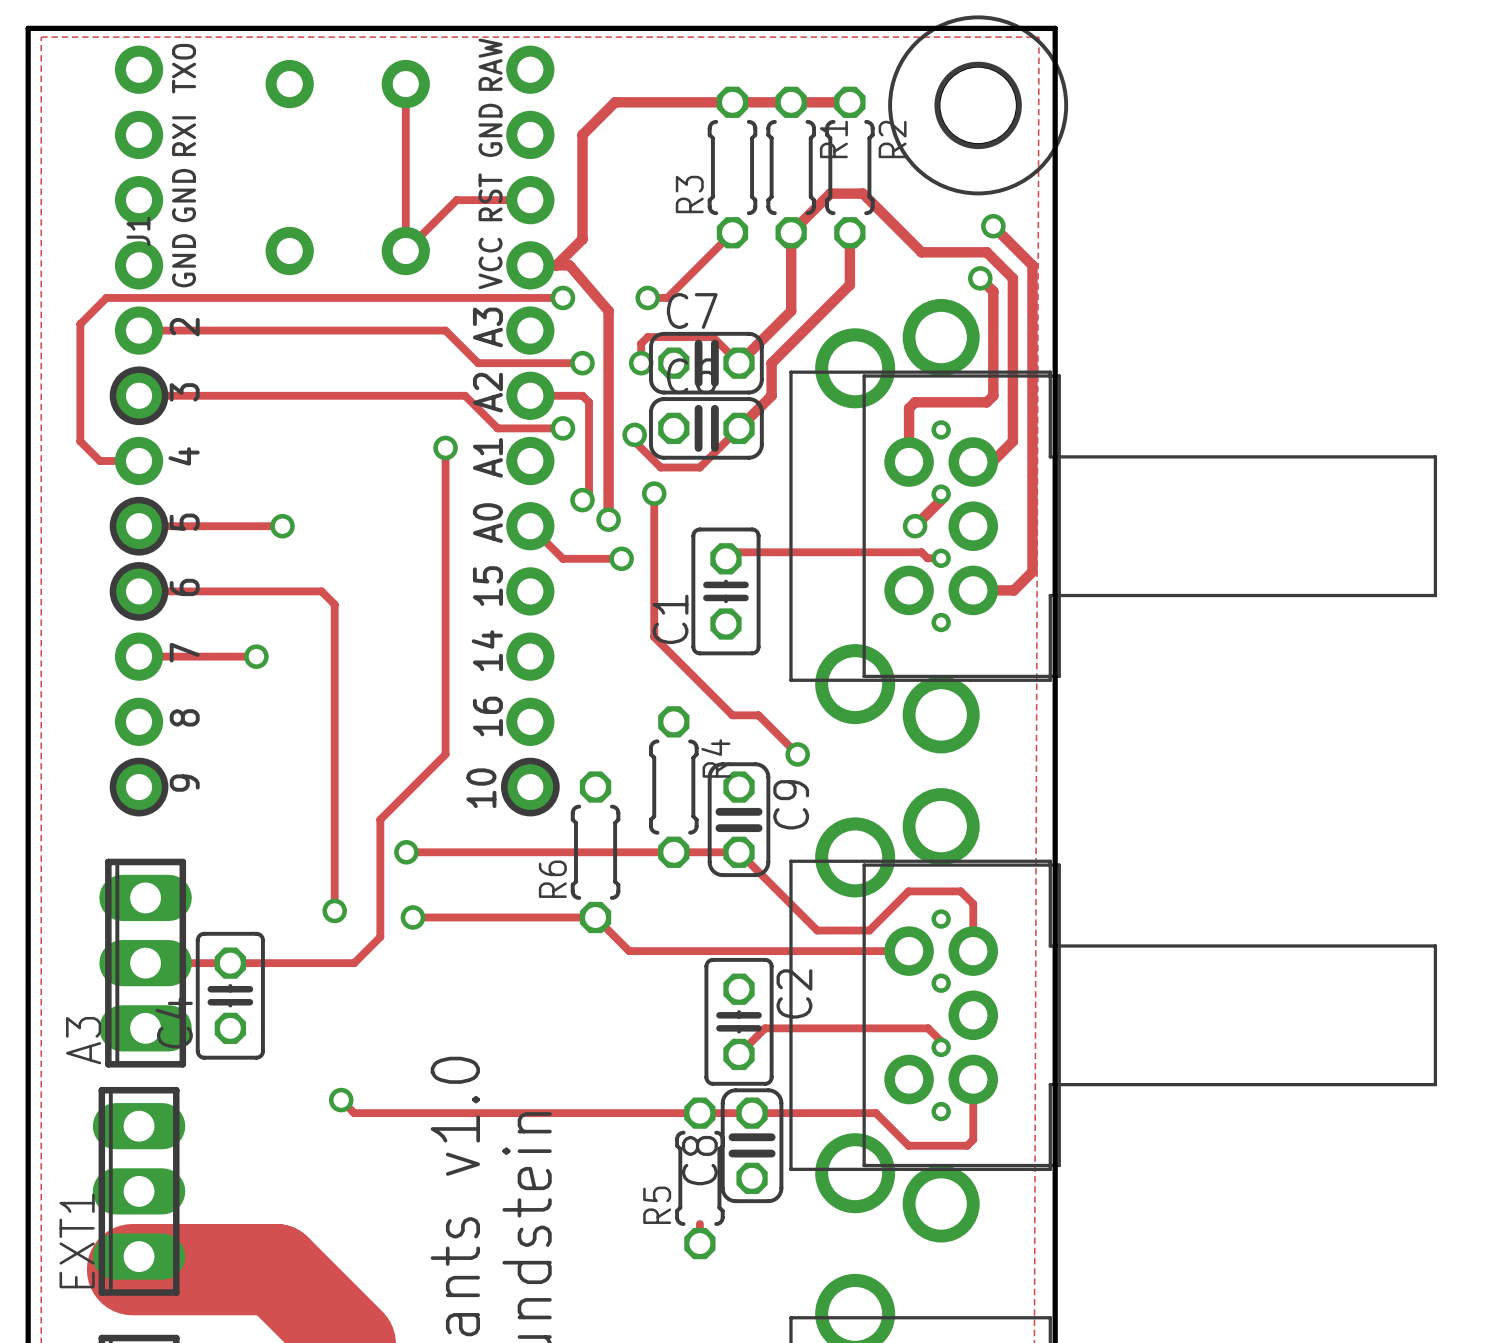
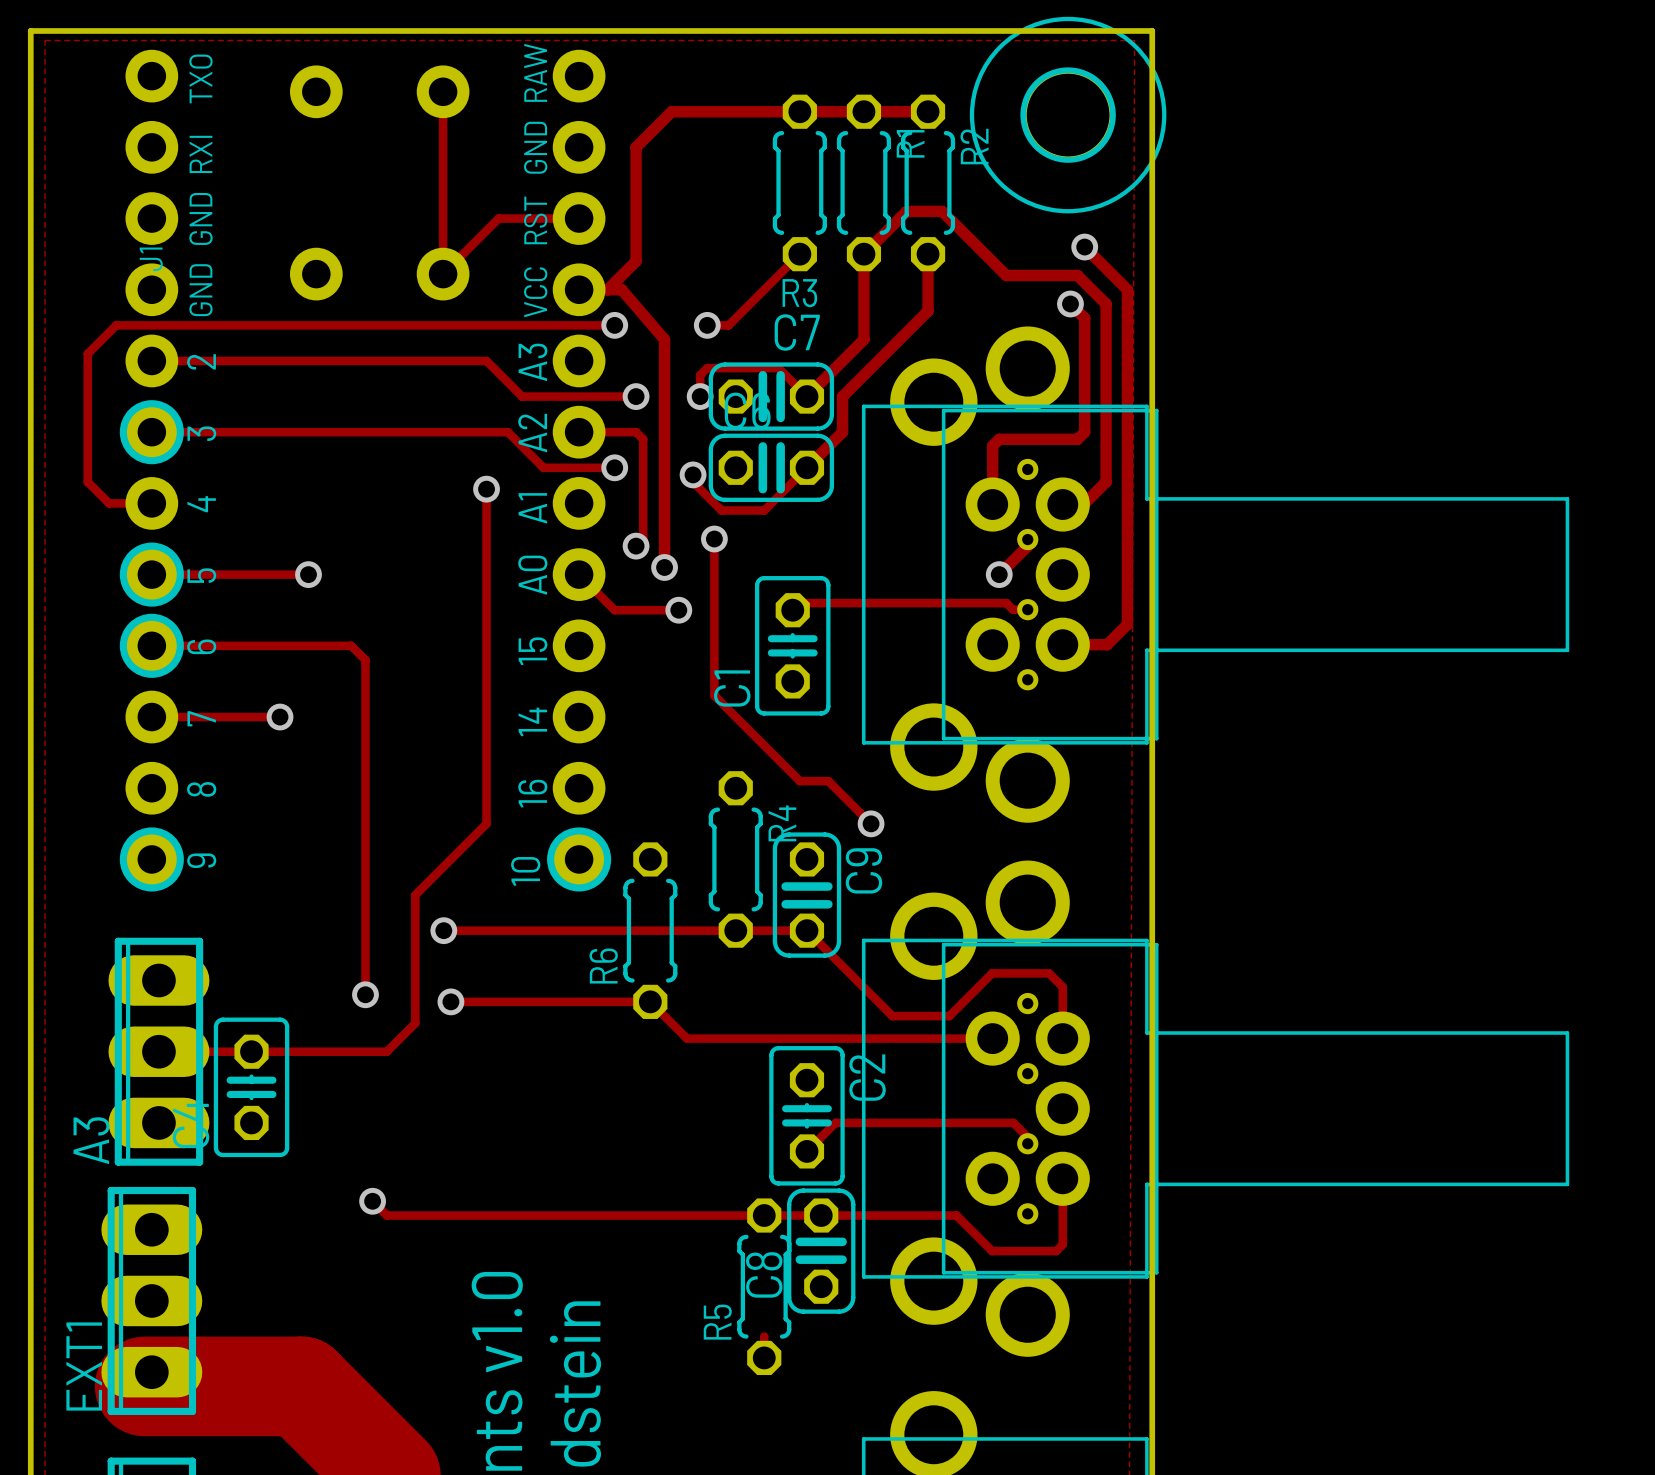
R3 name rotation: 0° (689, 194) -> 90° clockwise (799, 293)
R3 name position: R3 (689, 194) -> R3 (799, 293)
C7 name position: C7 (692, 311) -> C7 (797, 332)

